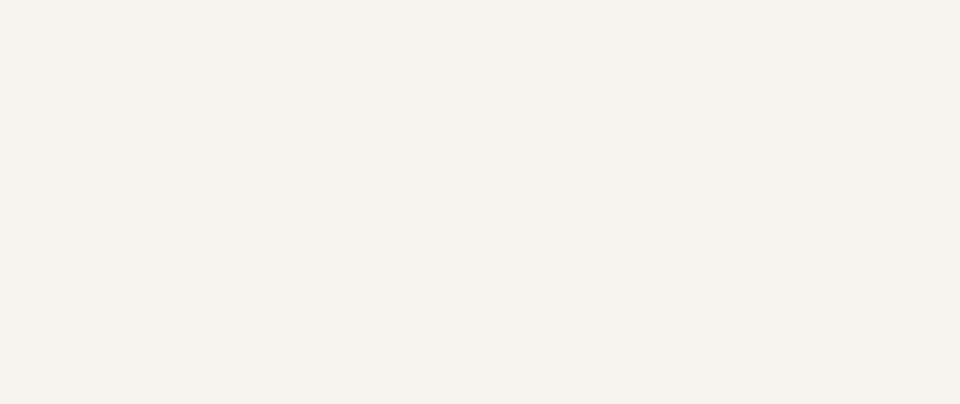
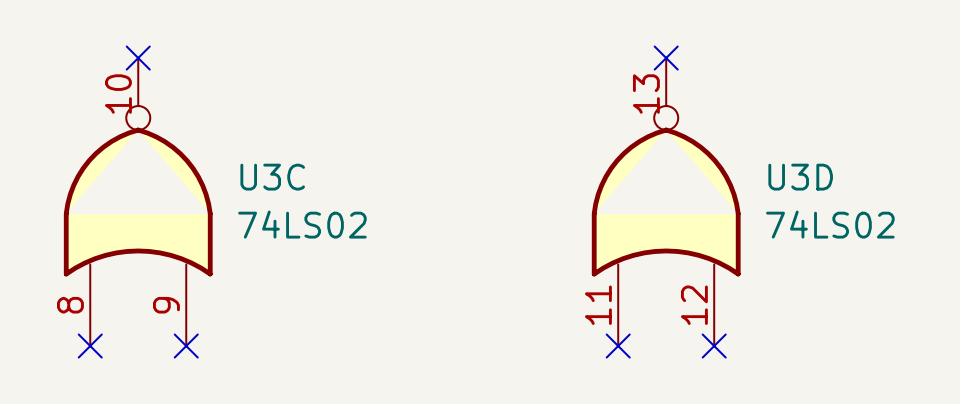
no-connect mark: none -> (138, 58)
no-connect mark: none -> (666, 58)
U3C: none -> 74LS02 (138, 202)
U3D: none -> 74LS02 (666, 202)
no-connect mark: none -> (90, 346)
no-connect mark: none -> (186, 346)
no-connect mark: none -> (618, 346)
no-connect mark: none -> (714, 346)

